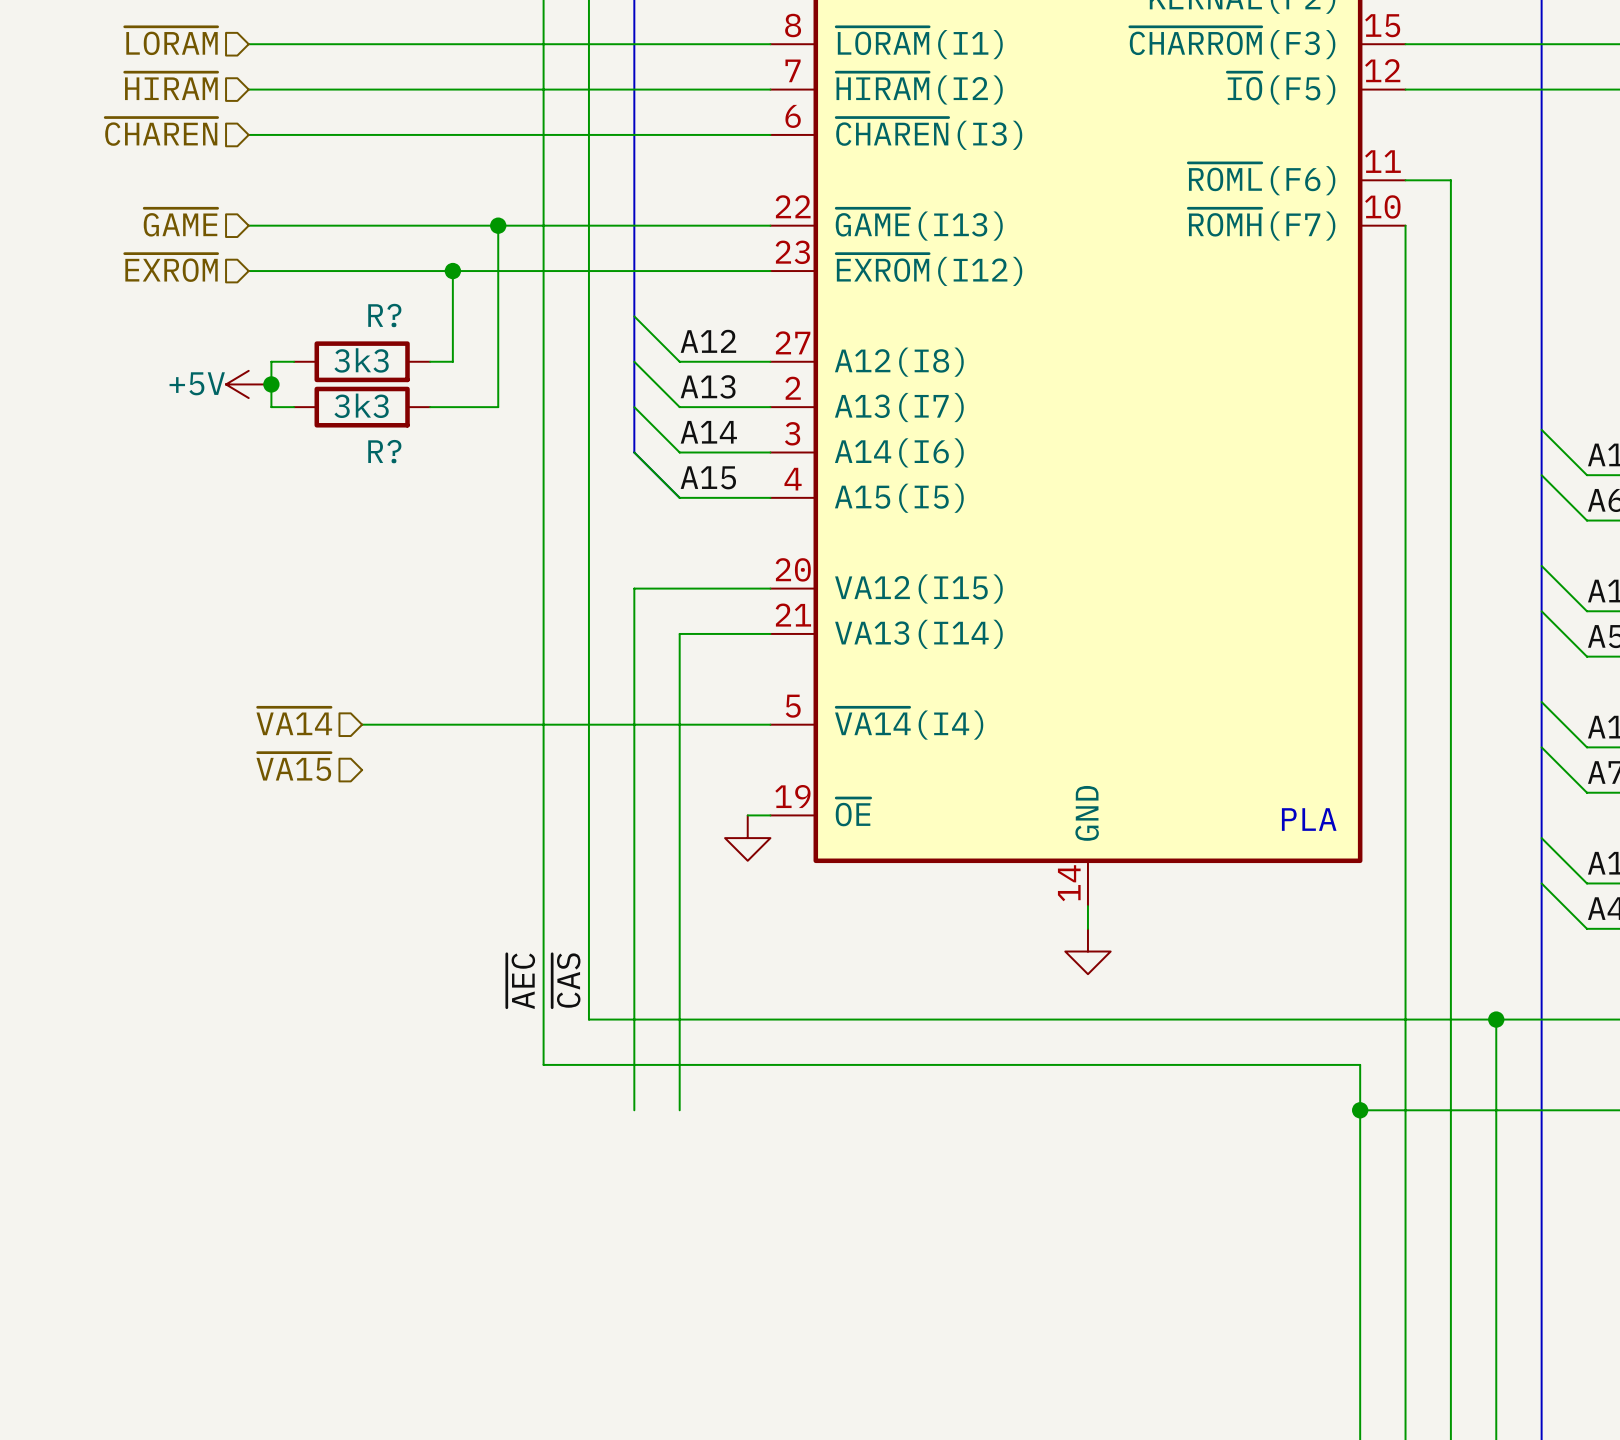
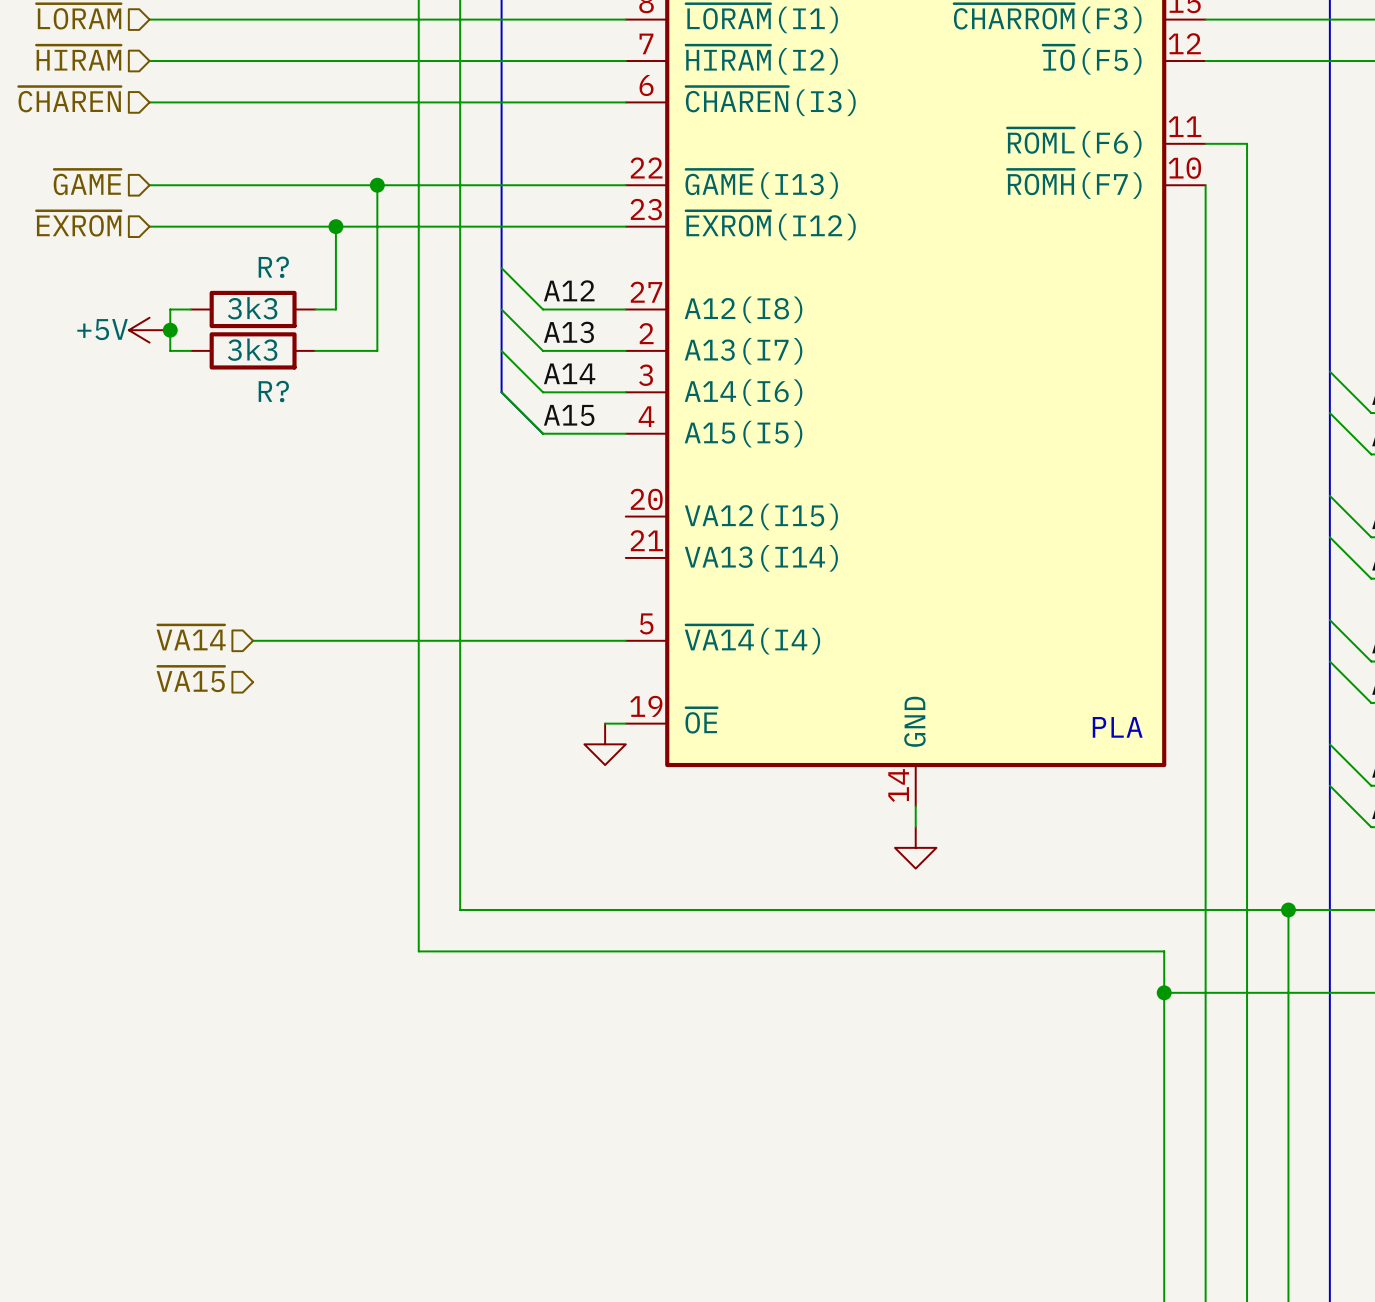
wire: (770, 588) (634, 588) (634, 1110) -> none
wire: (770, 633) (679, 633) (679, 1110) -> none
label: ~{CAS} (566, 980) -> none
label: ~{AEC} (520, 981) -> none

